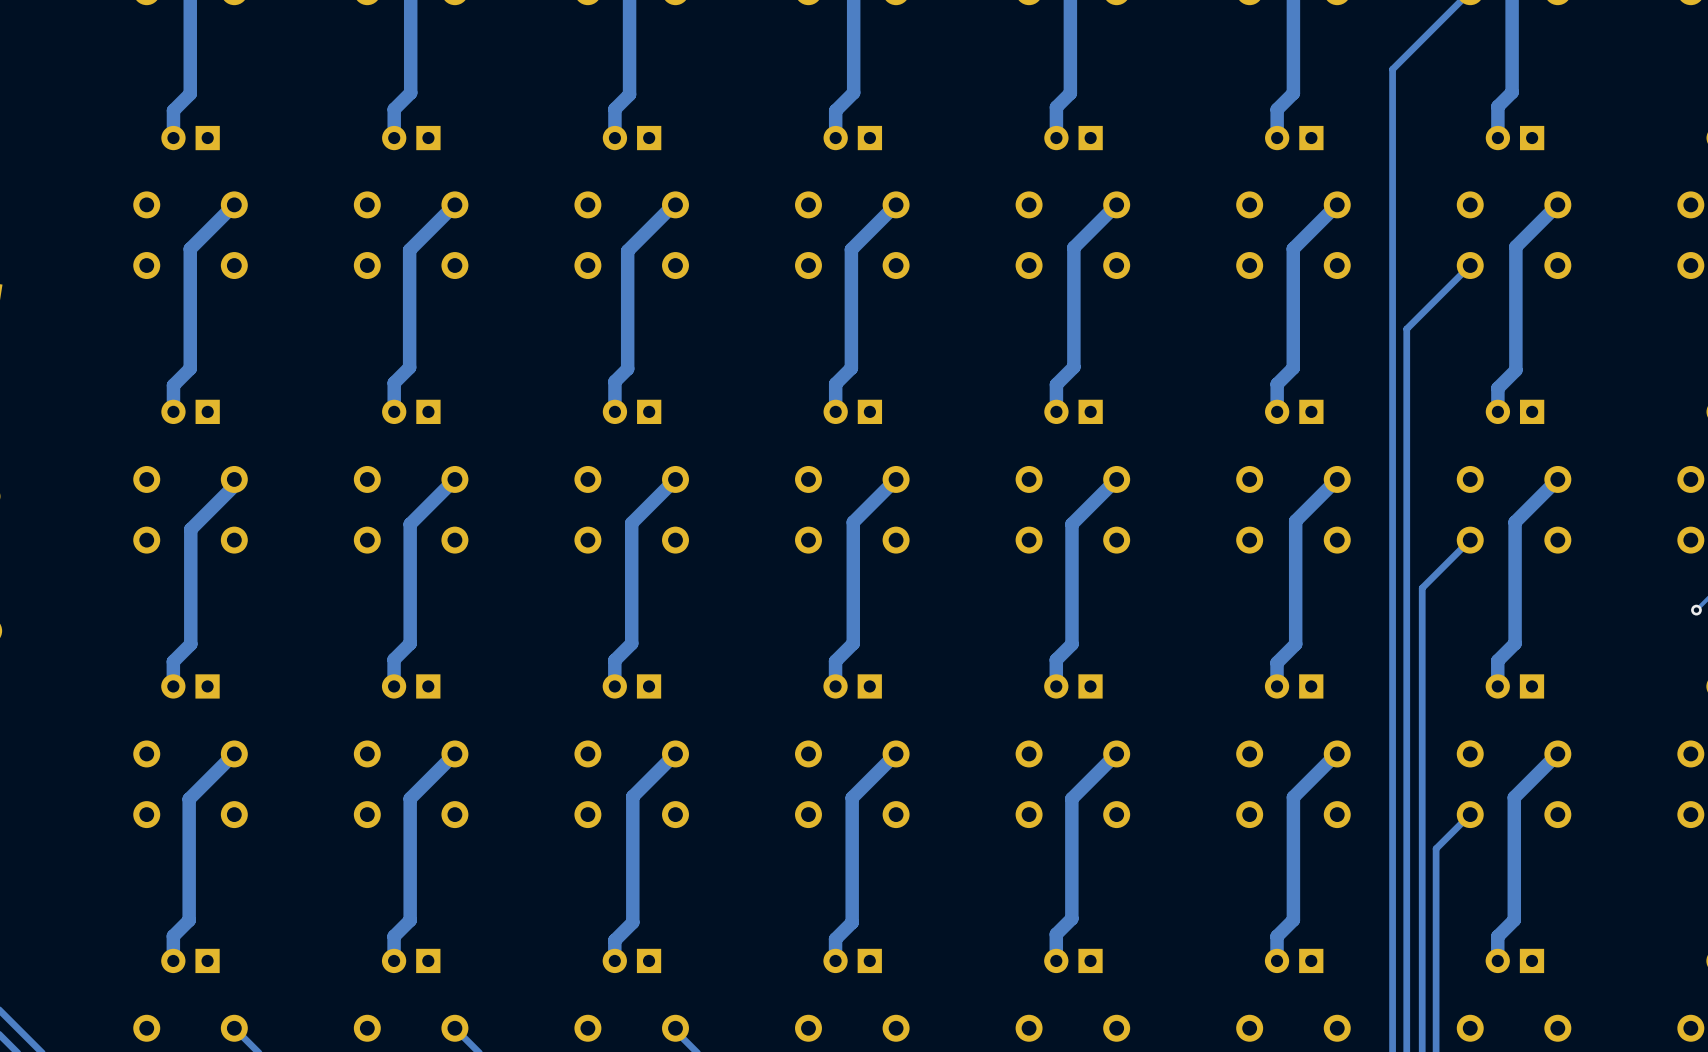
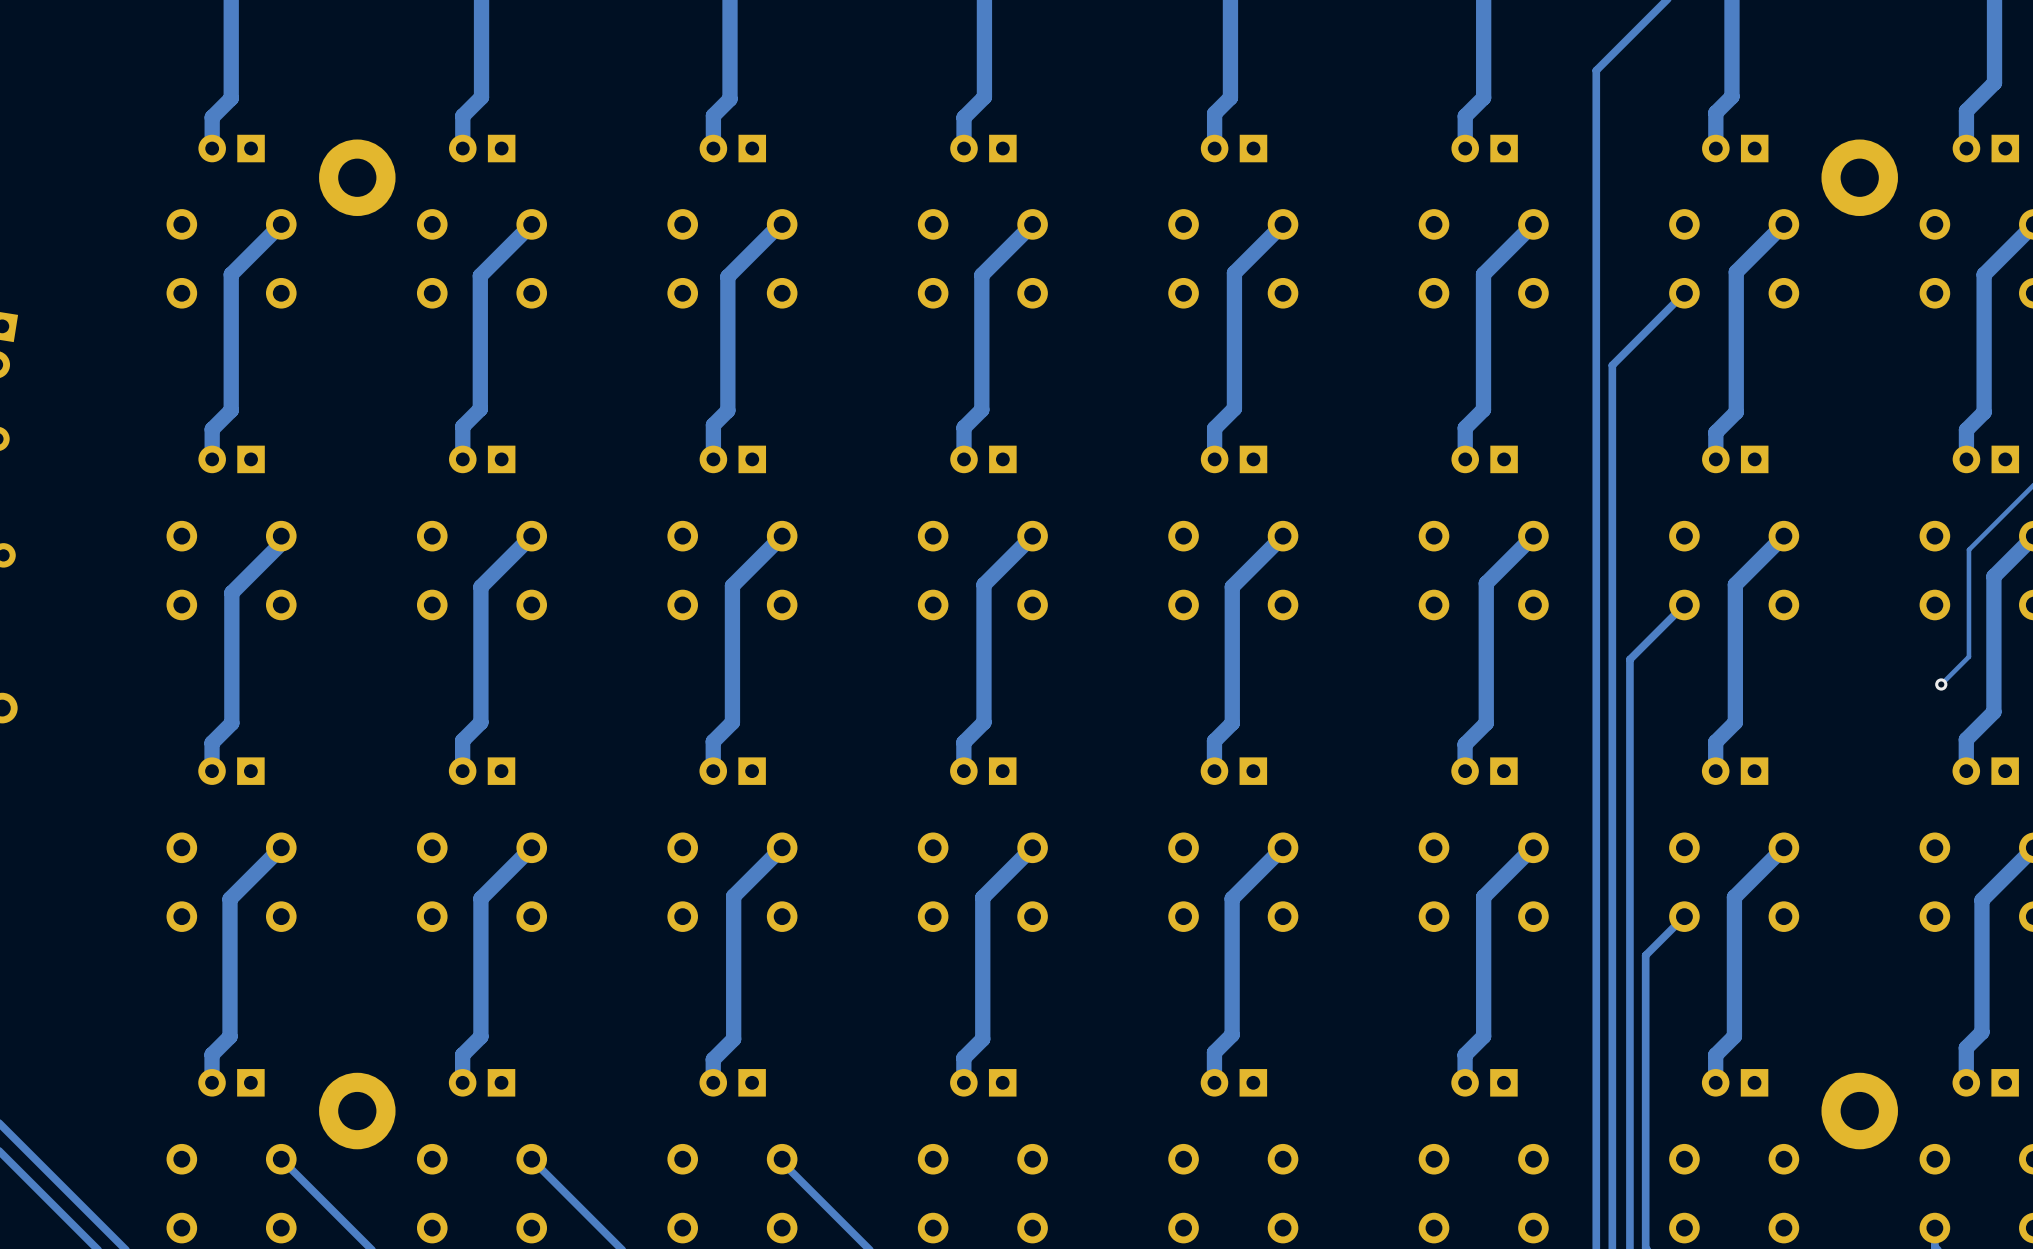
part: none -> (357, 177)
part: none -> (1859, 177)
part: none -> (357, 1111)
part: none -> (1859, 1111)

